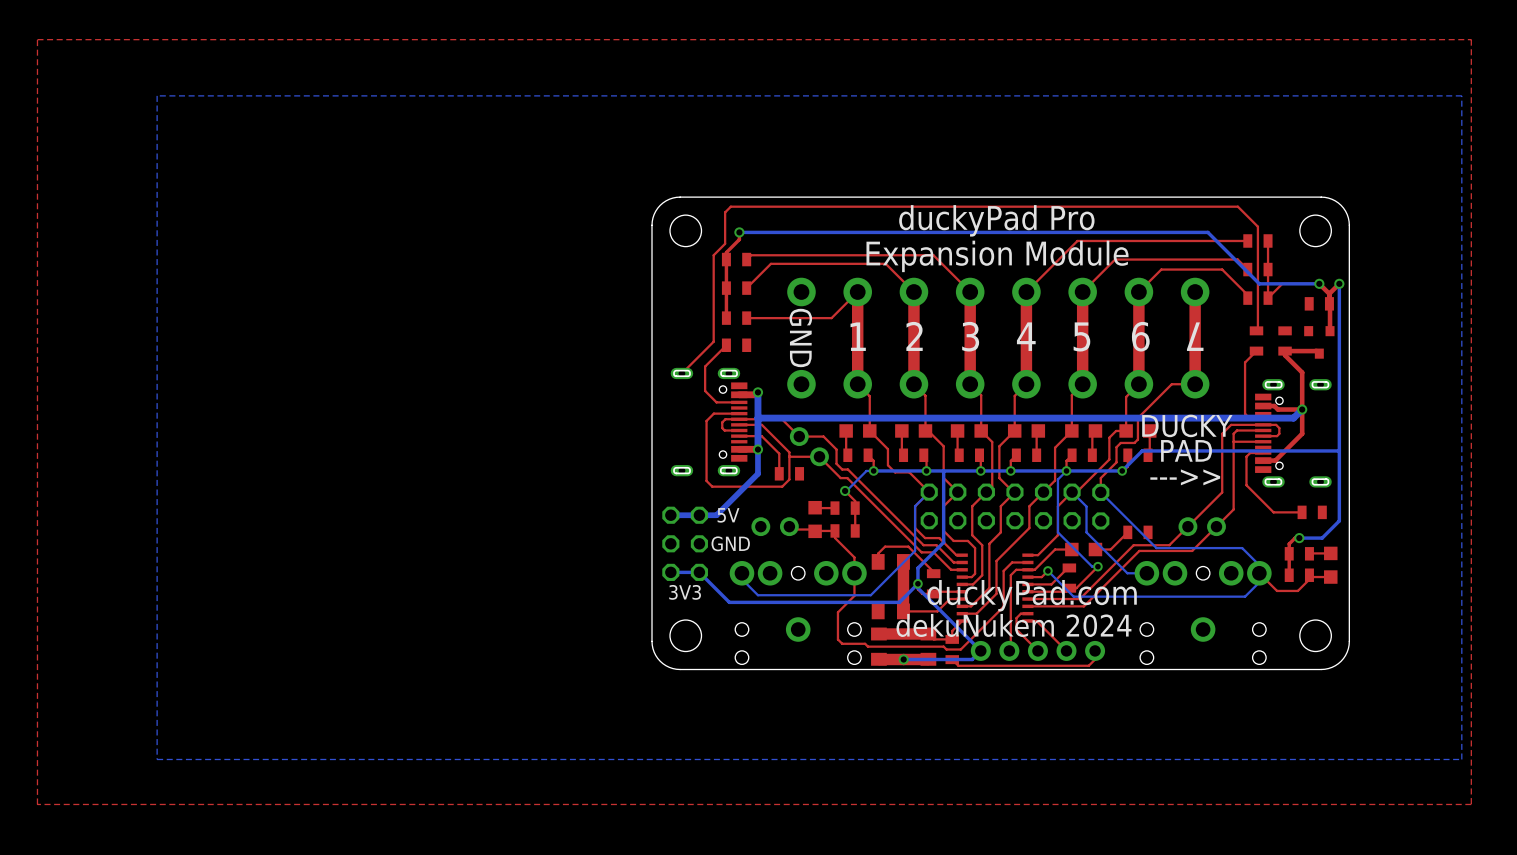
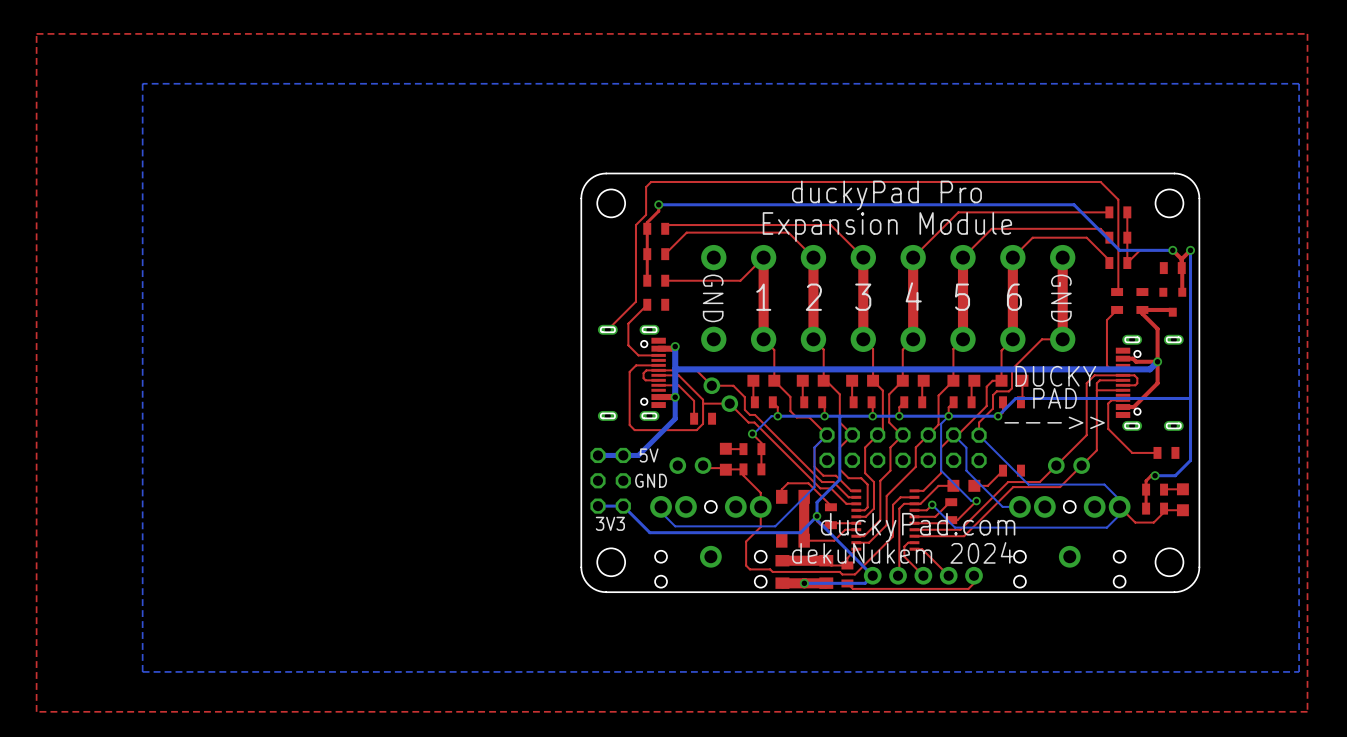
text: 7 (1195, 336) -> GND (1061, 298)

